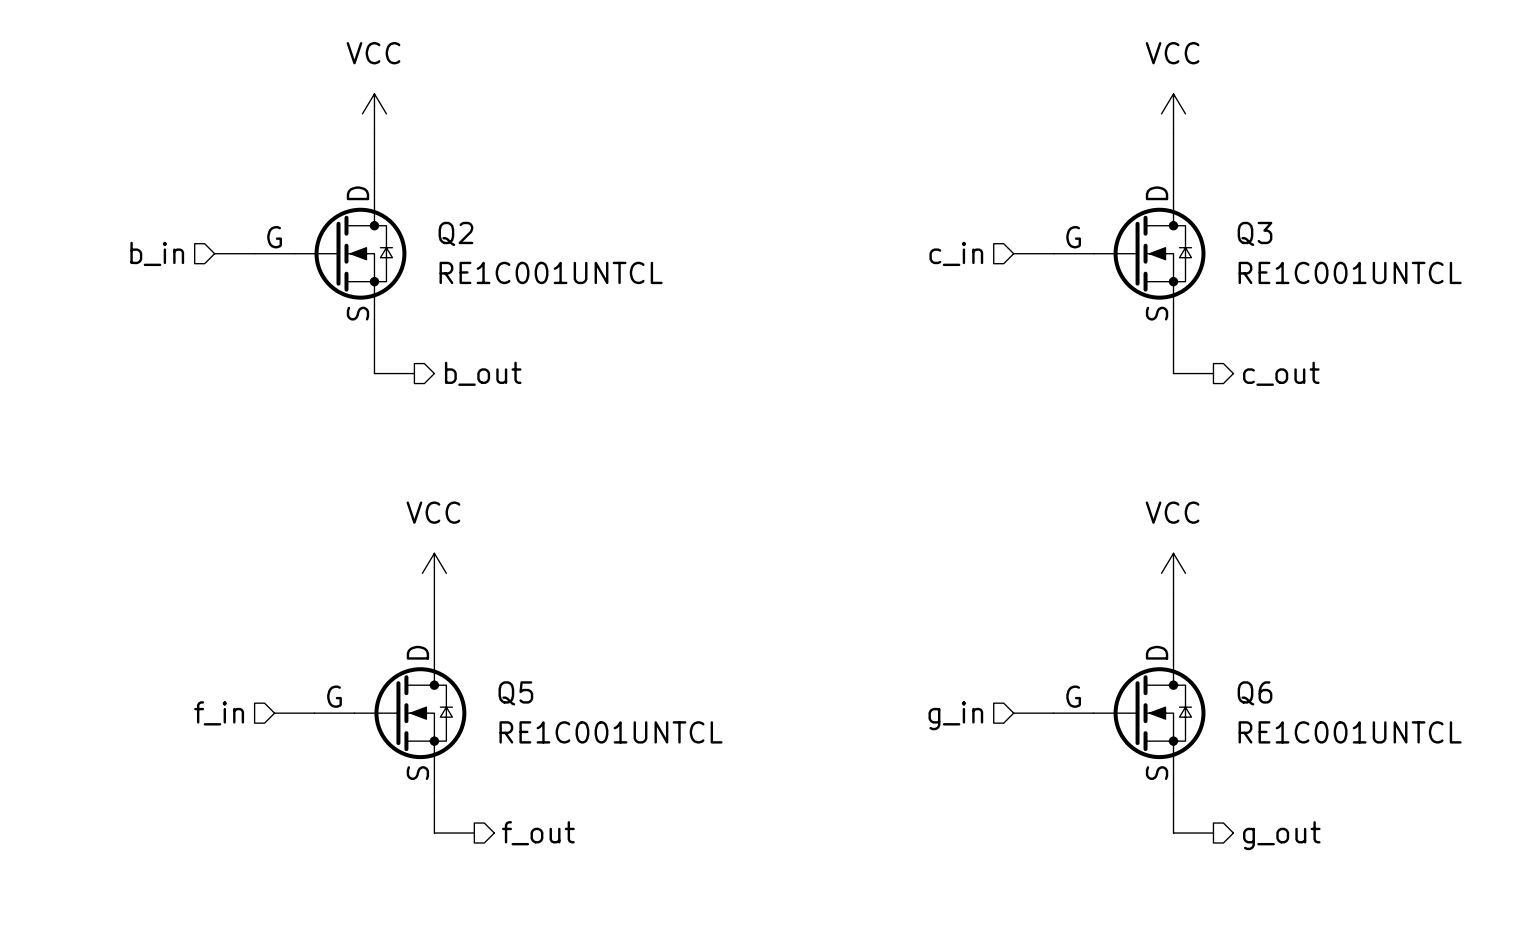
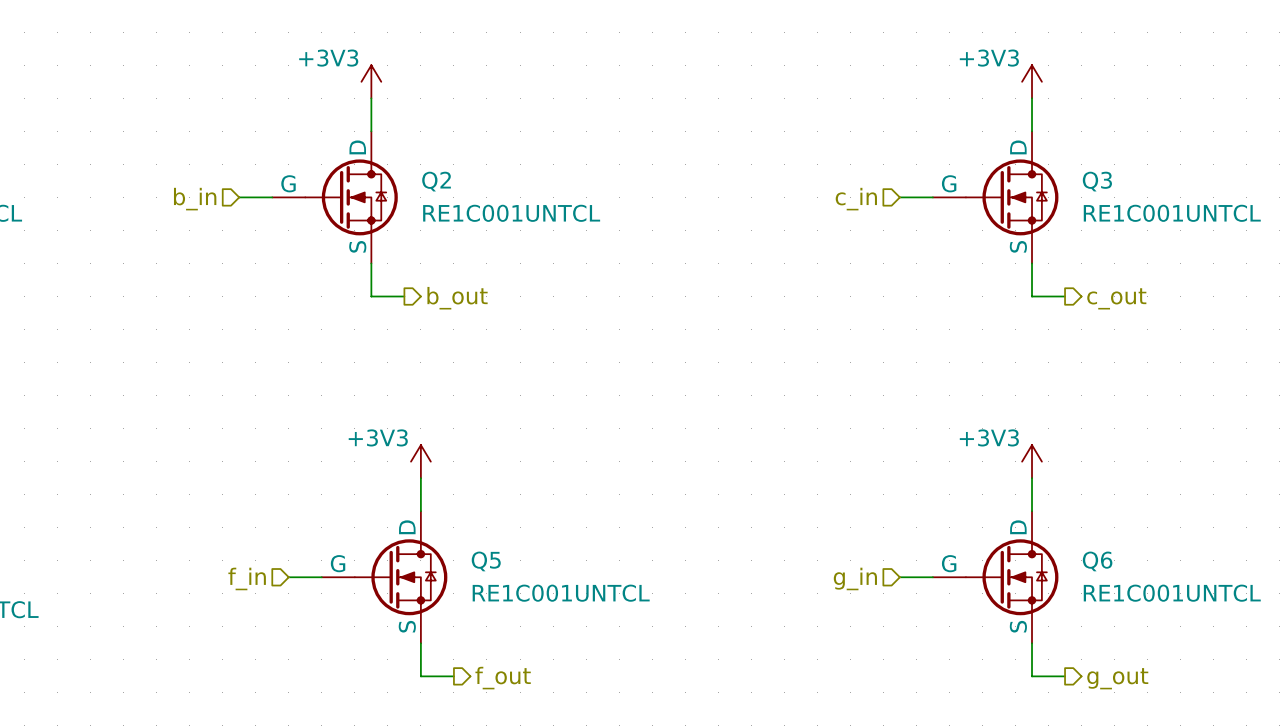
power symbol: VCC (374, 113) -> +3V3 (371, 81)
power symbol: VCC (1173, 113) -> +3V3 (1032, 81)
power symbol: VCC (434, 573) -> +3V3 (420, 461)
power symbol: VCC (1173, 573) -> +3V3 (1032, 461)

